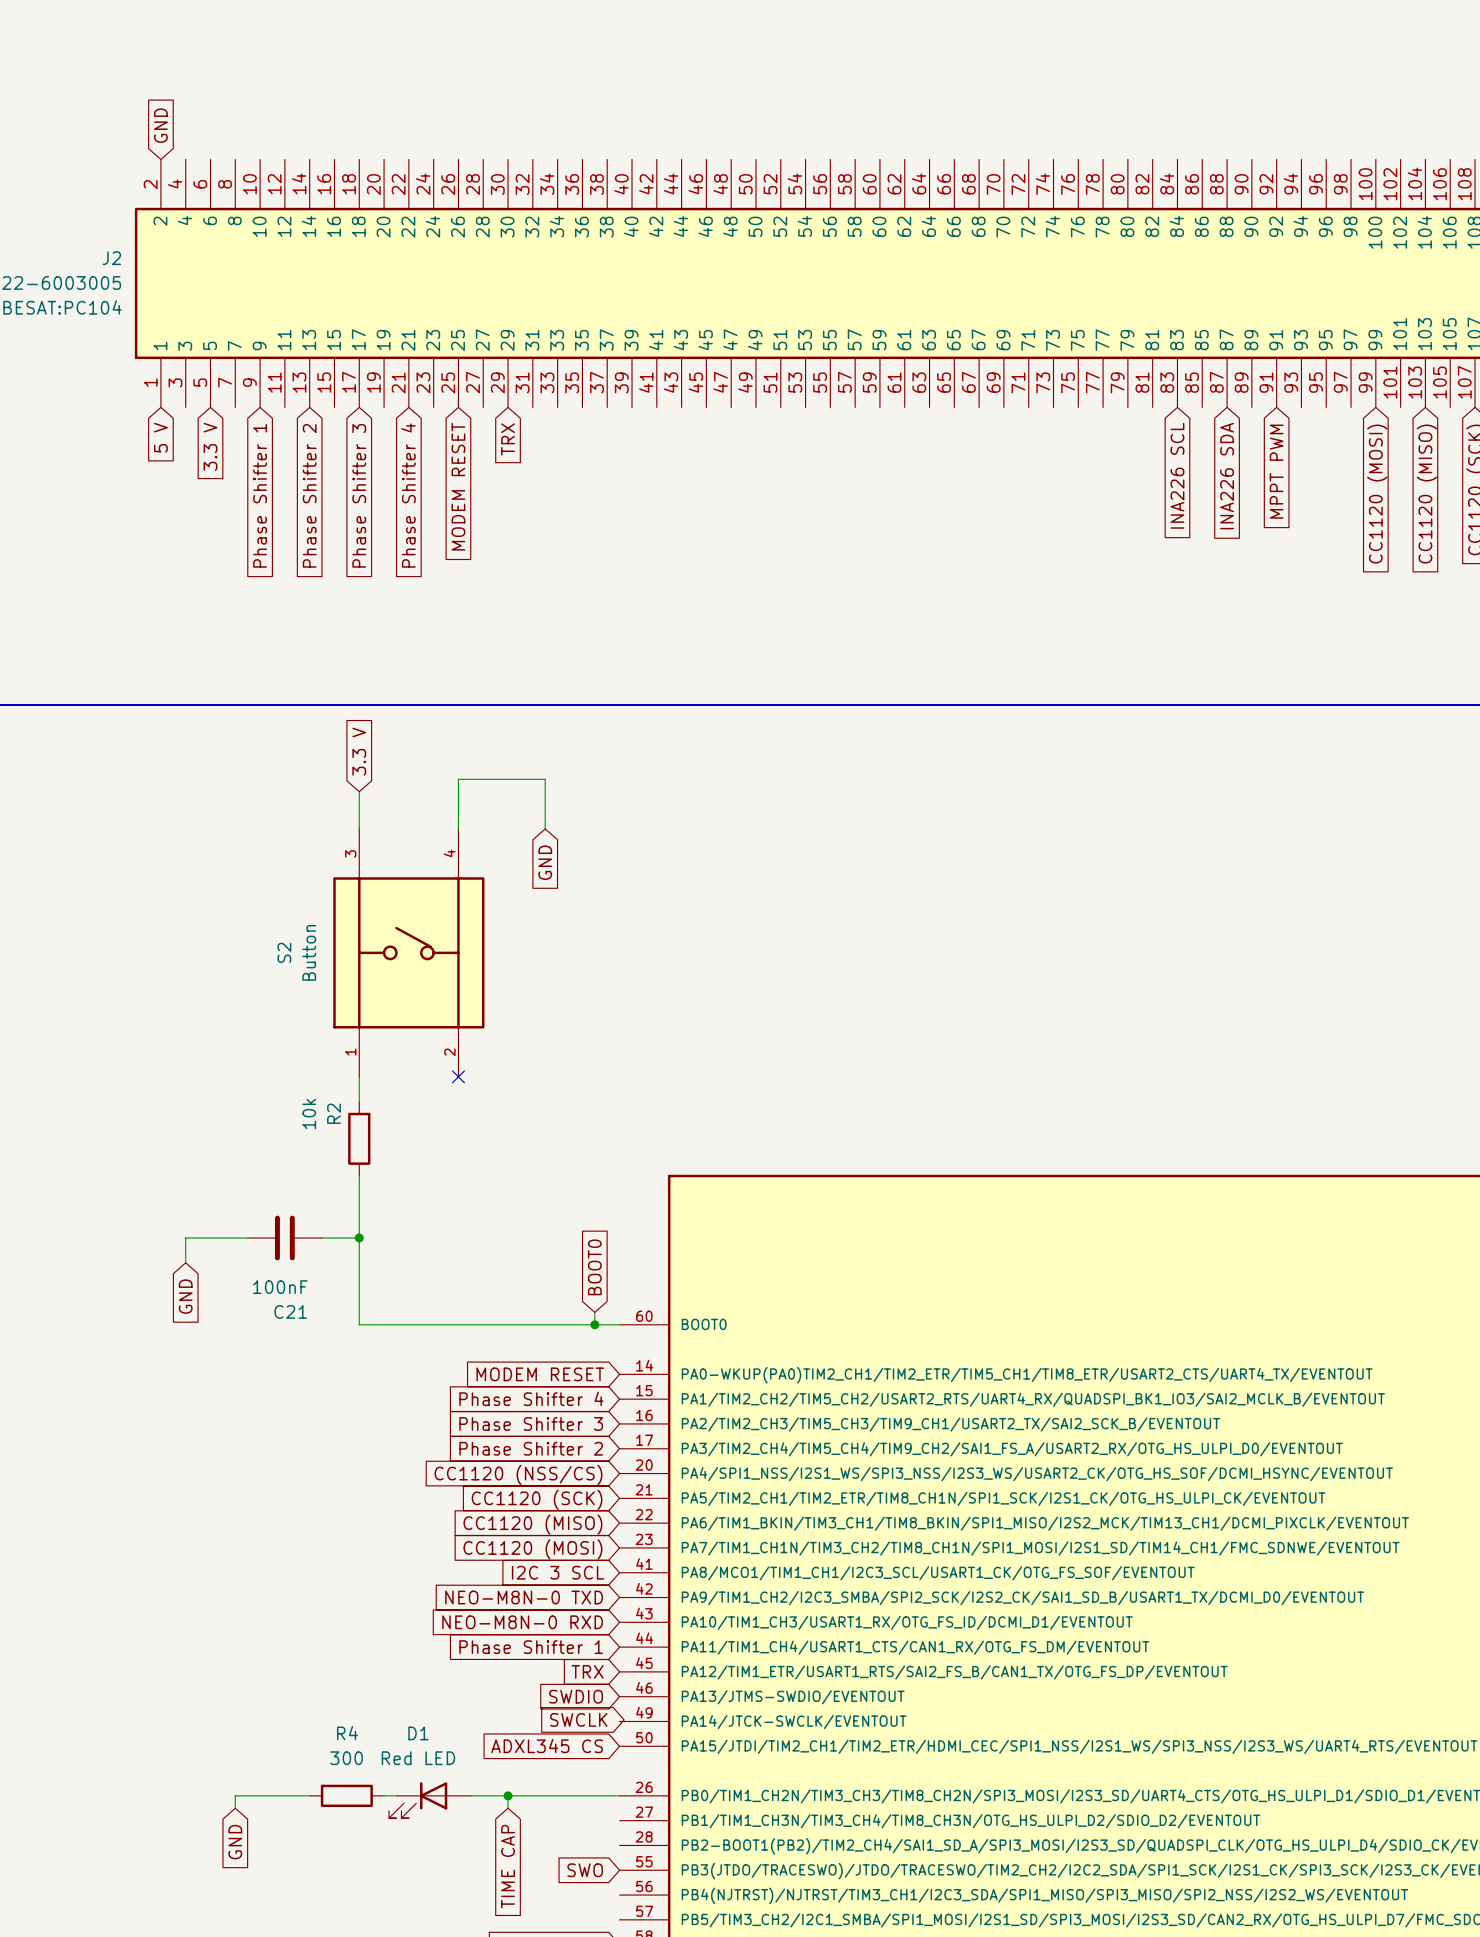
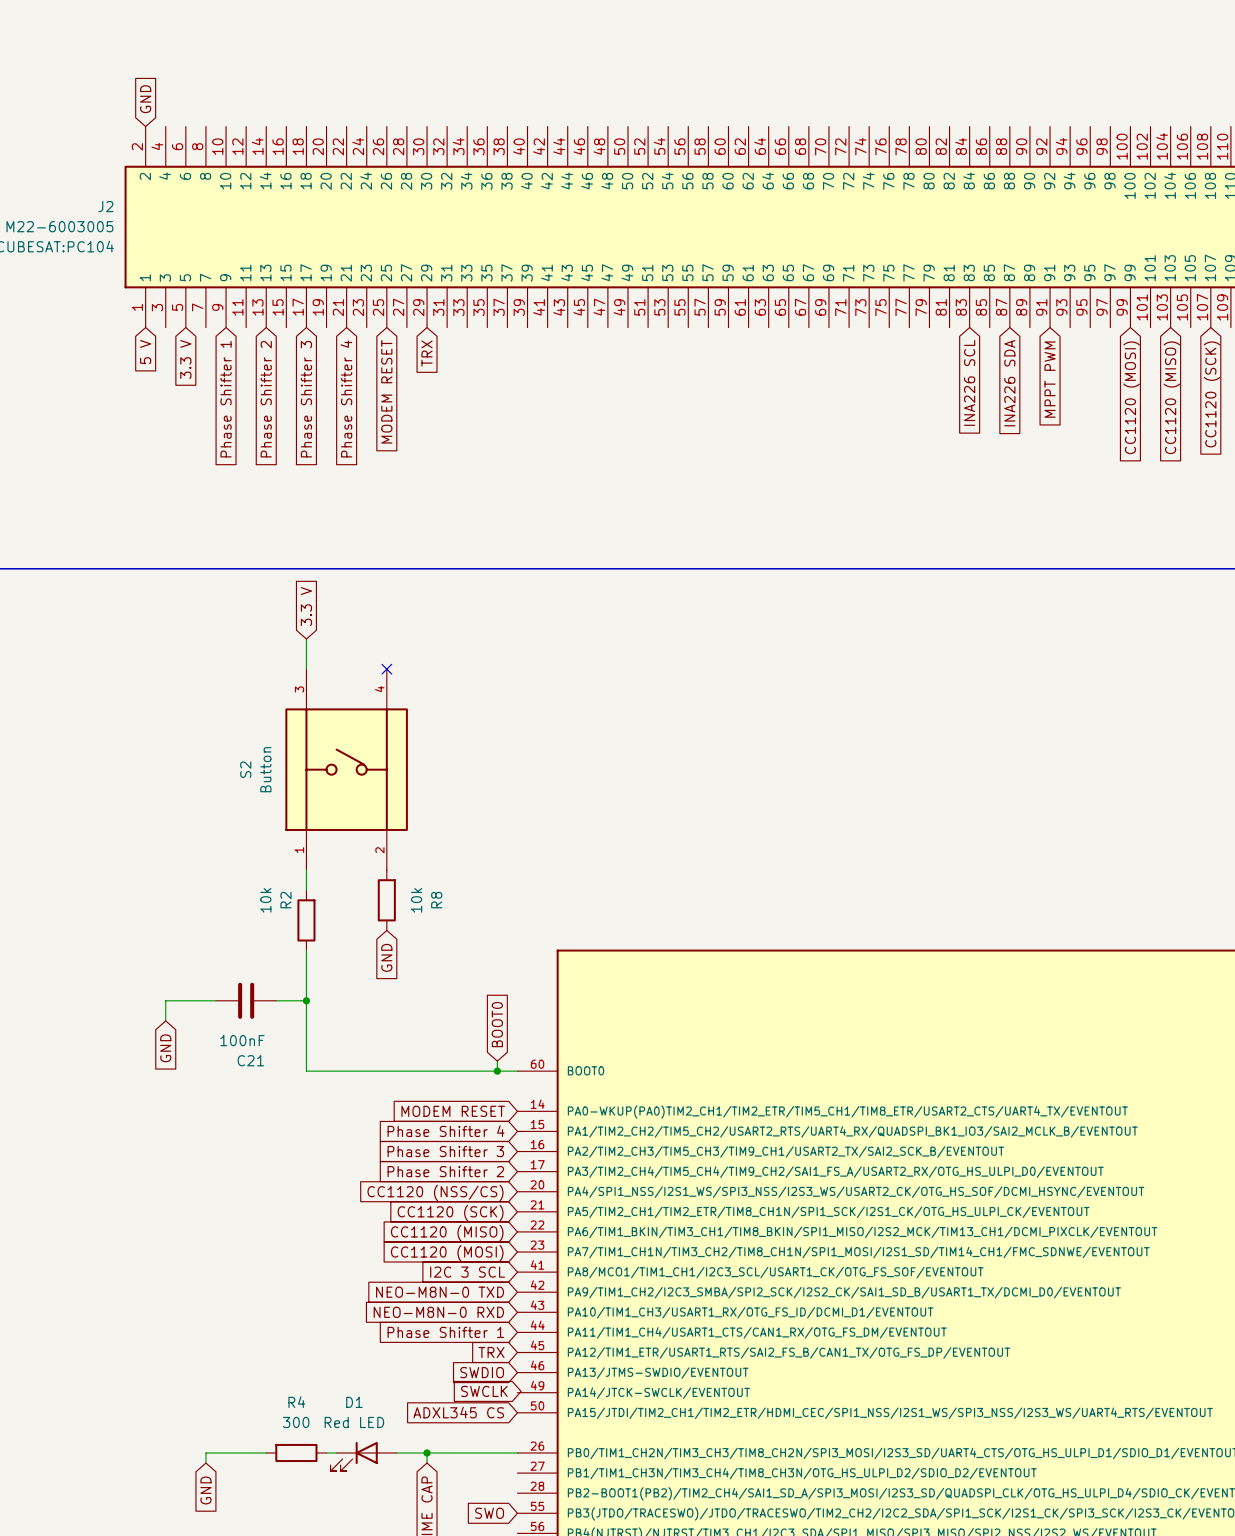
wire: (458, 828) (458, 779) (545, 779) (545, 828) -> none
no-connect mark: none -> (386, 669)
global label: GND (545, 862) -> none
no-connect mark: (458, 1076) -> none
R8: none -> 10k (386, 900)
global label: none -> GND (386, 957)

